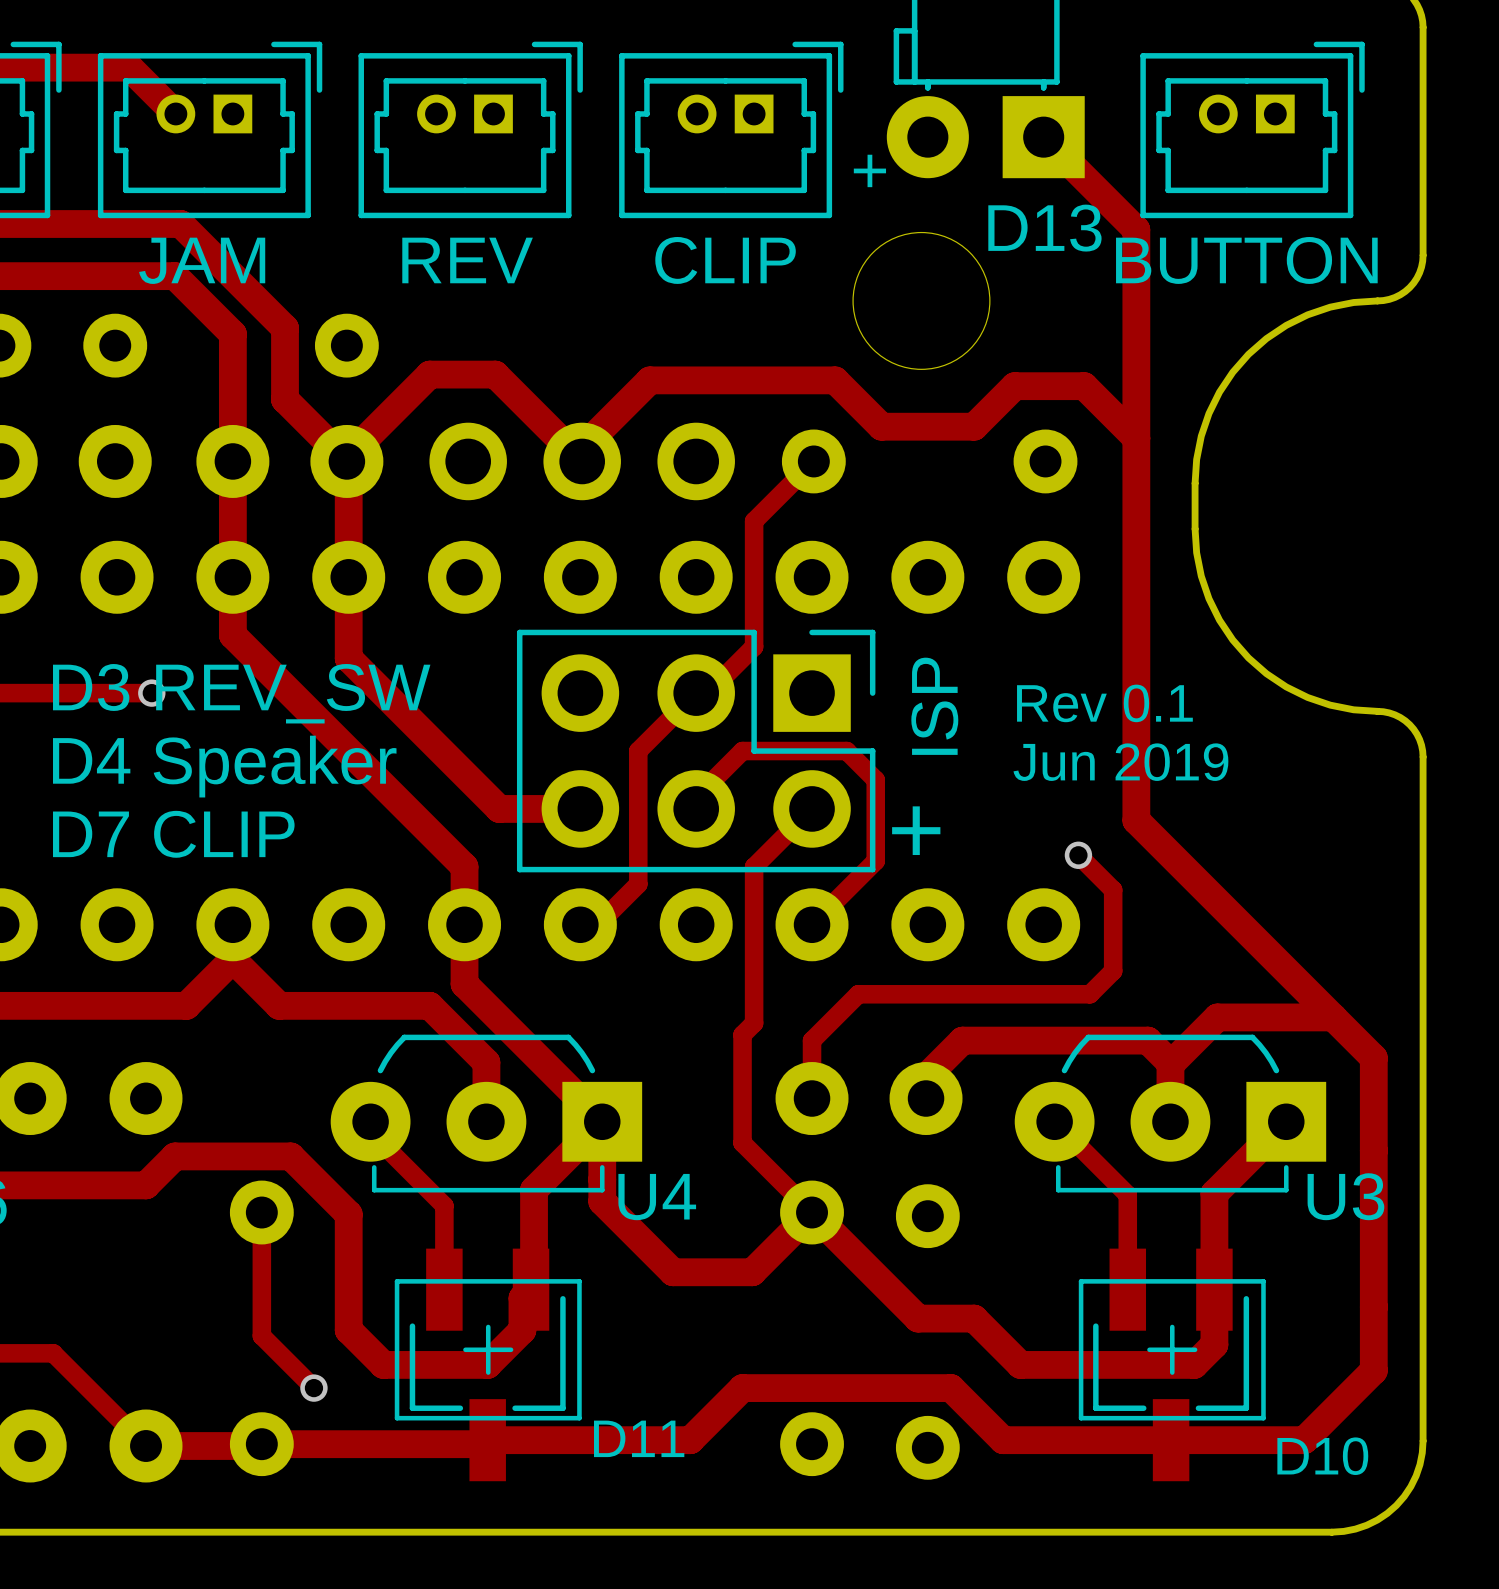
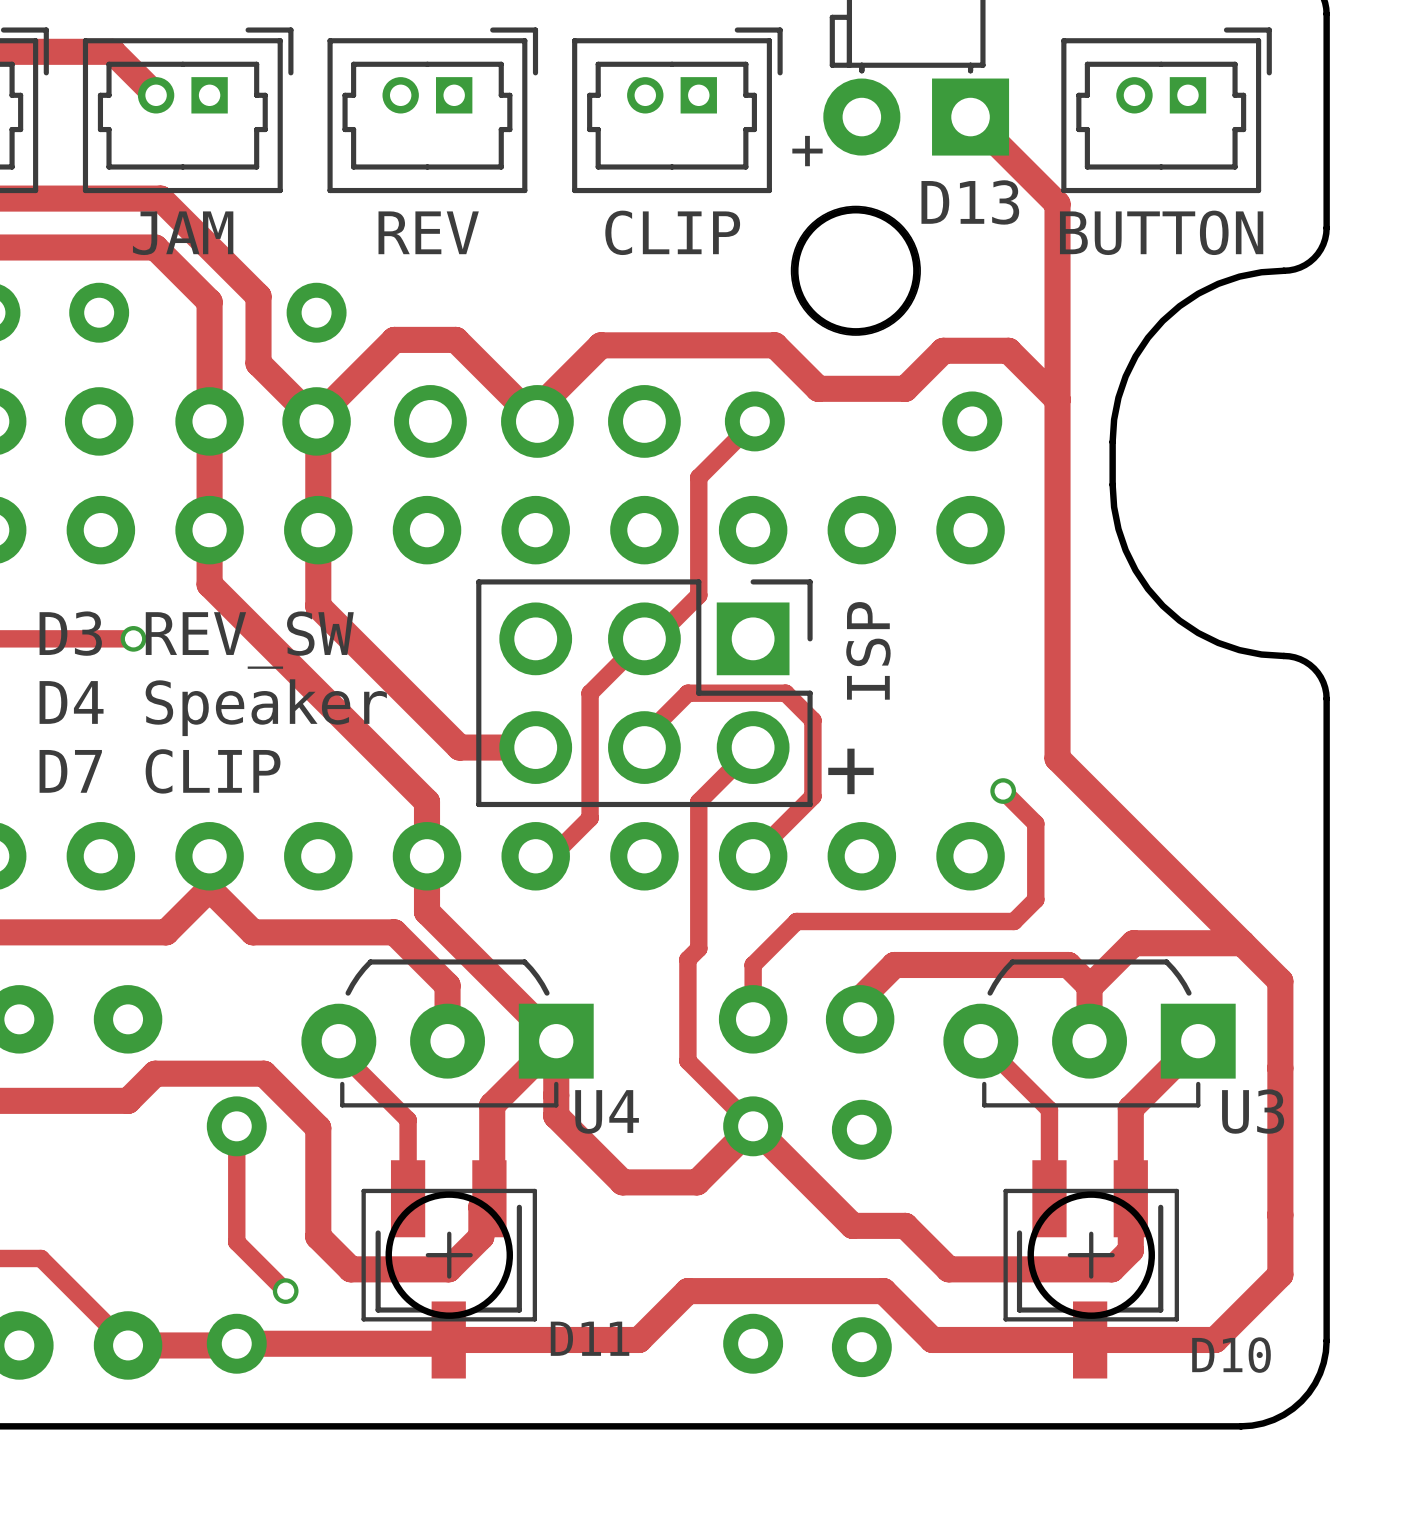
round board edge: none -> [792, 207, 920, 335]
text: Rev 0.1 (1104, 703) -> none
text: Jun 2019 (1120, 762) -> none
round board edge: none -> [385, 1191, 514, 1319]
round board edge: none -> [1027, 1191, 1155, 1319]

